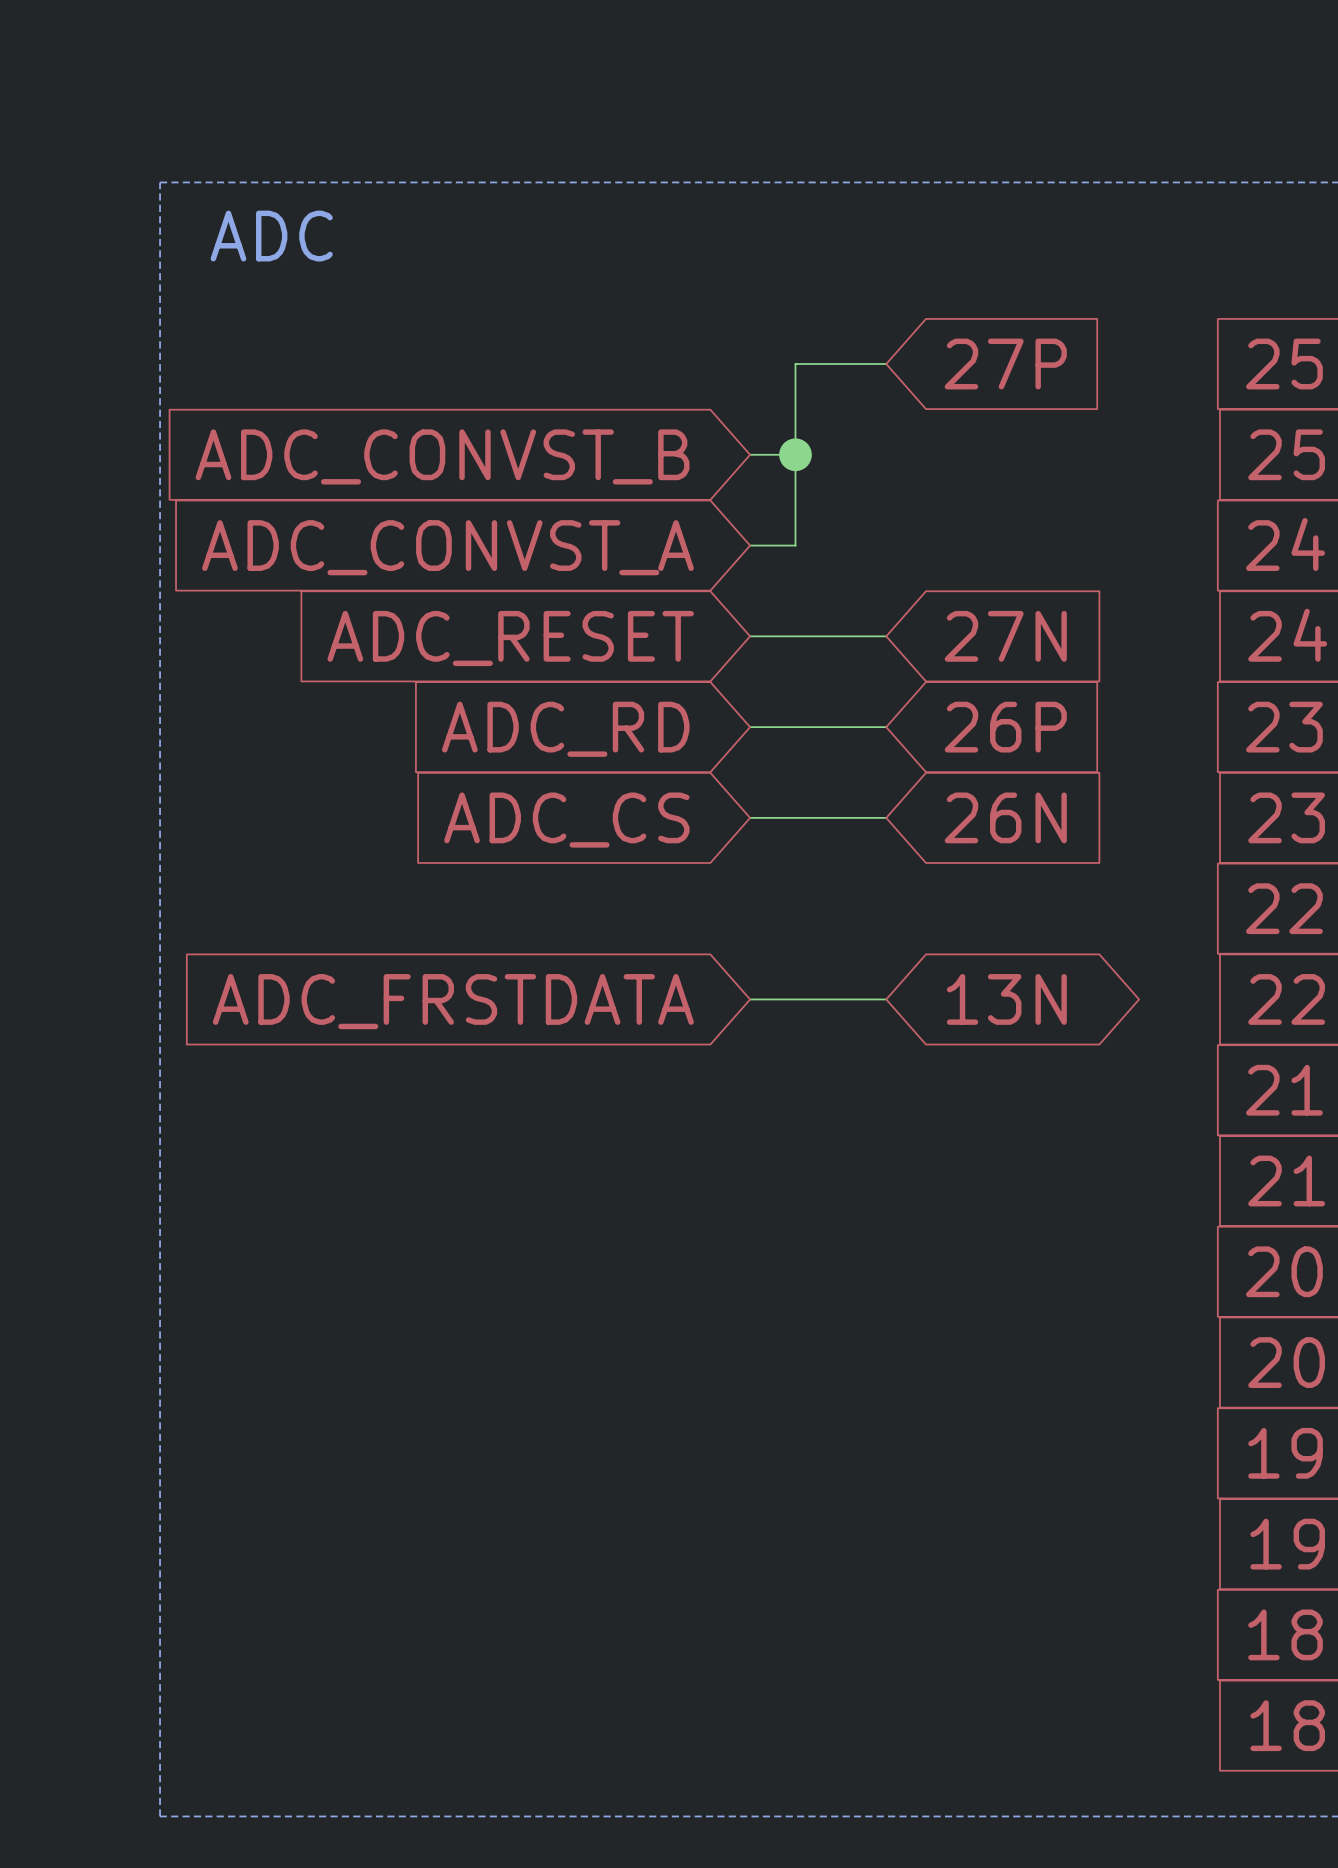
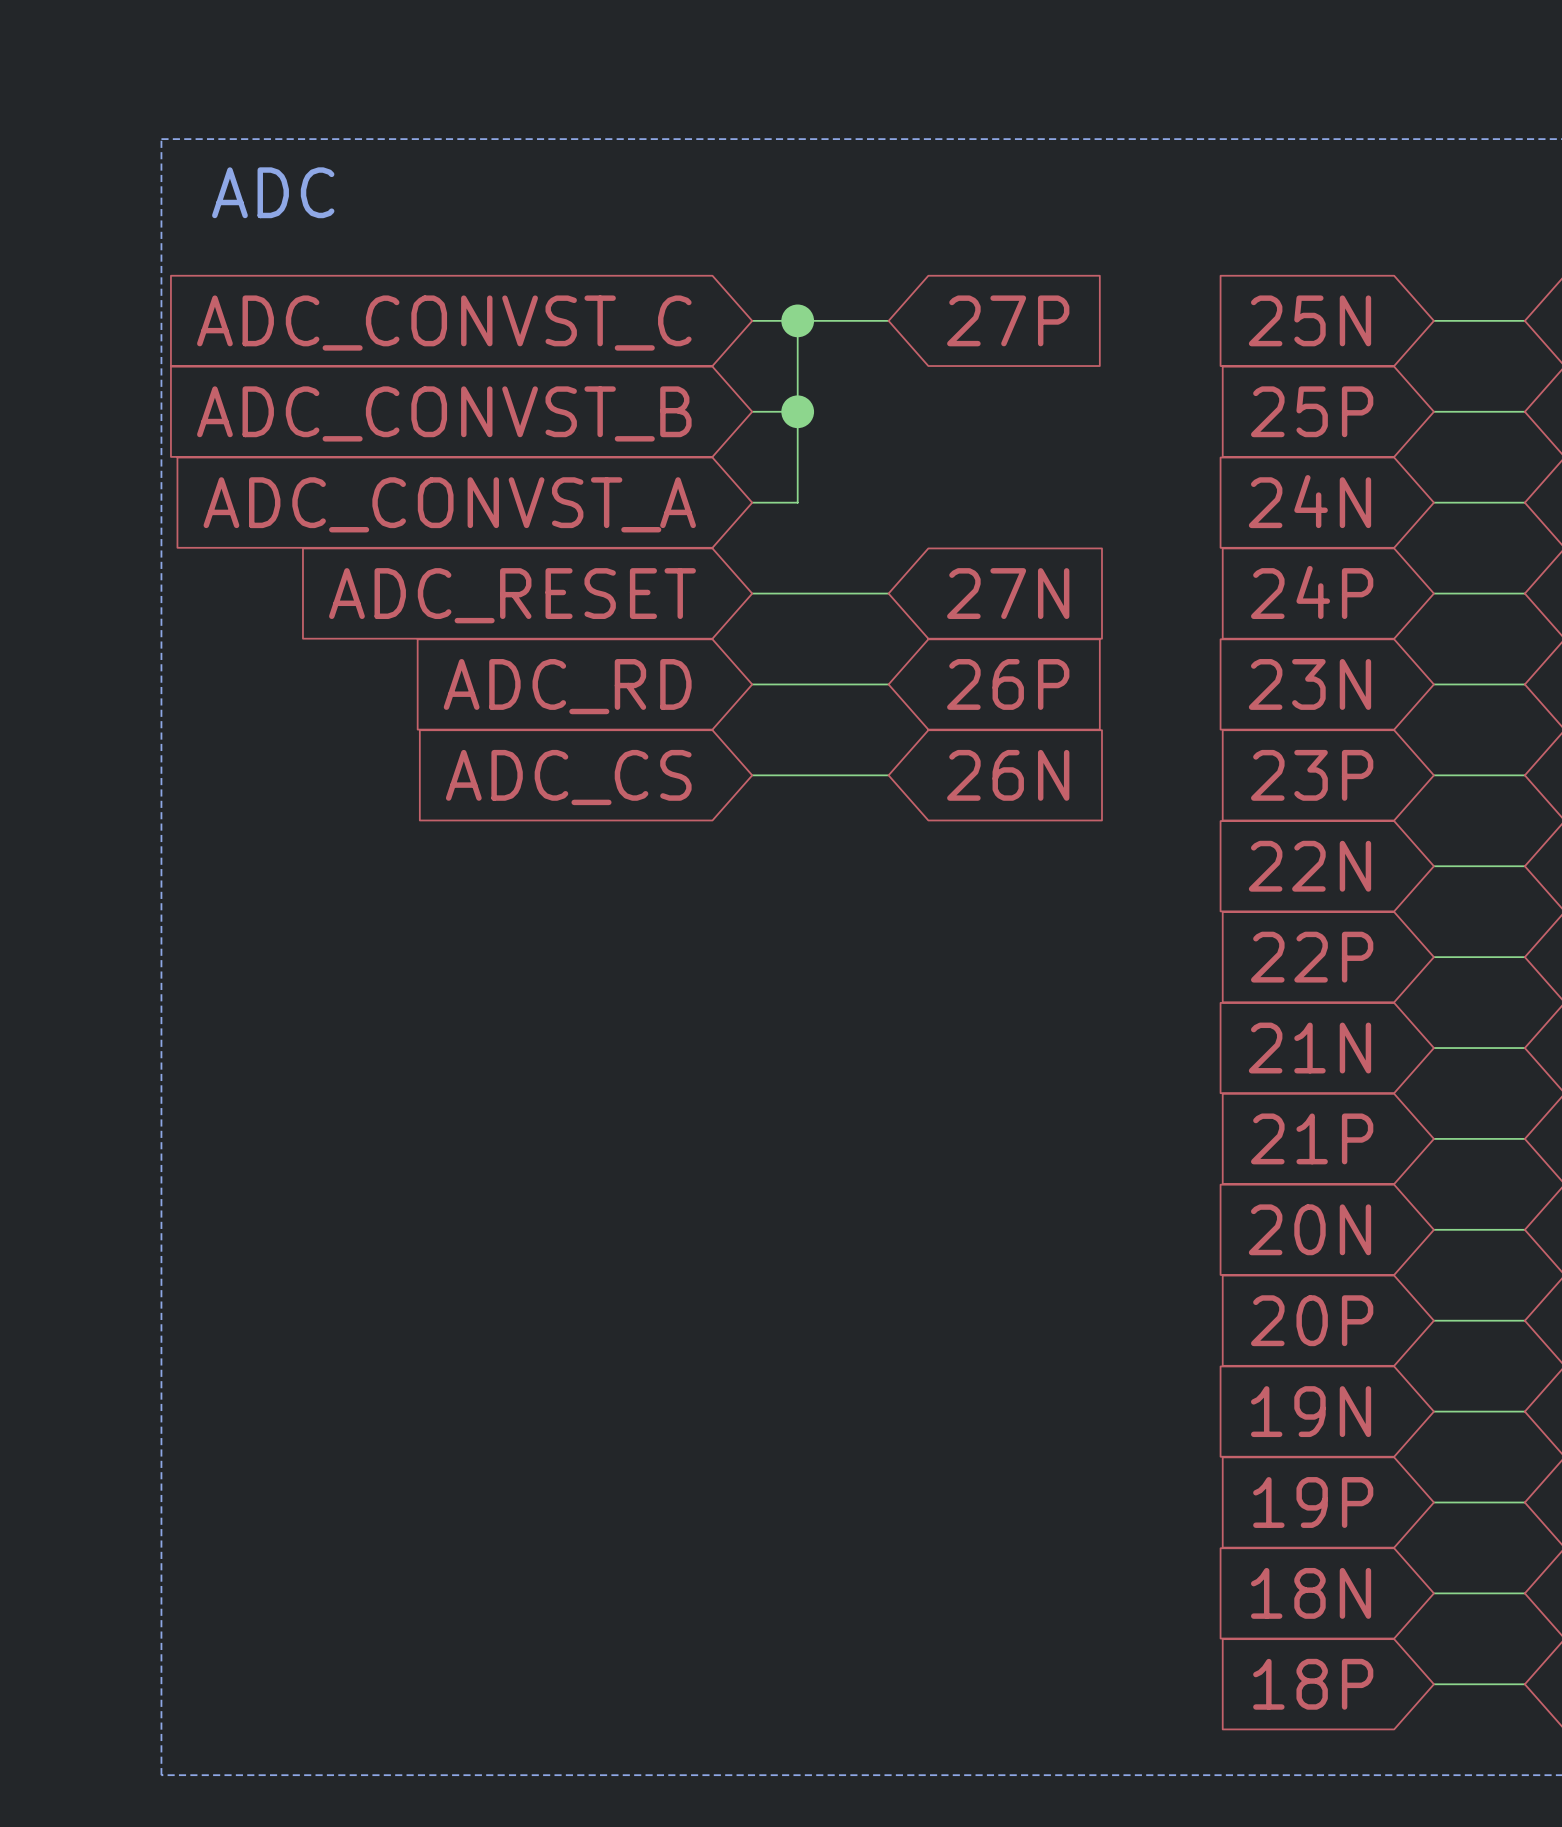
wire: none -> (752, 320) (797, 320)
junction: none -> (797, 320)
global label: none -> ADC_CONVST_C (444, 323)
wire: (750, 999) (886, 999) -> none
global label: 13N (1006, 999) -> none
global label: ADC_FRSTDATA (453, 1001) -> none

